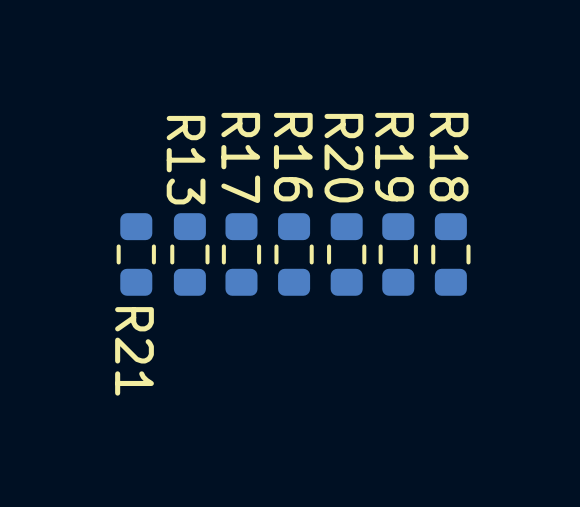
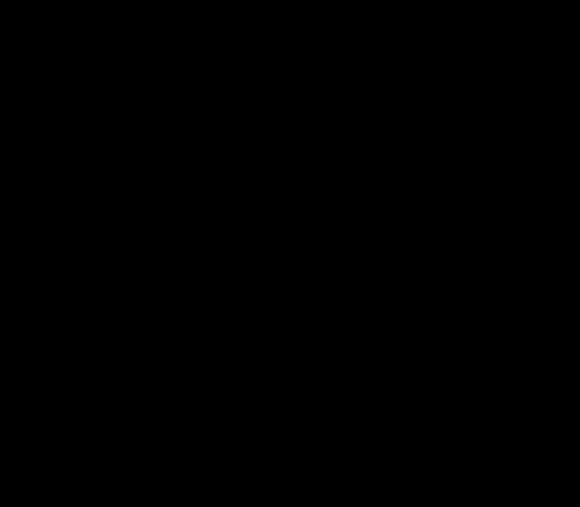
R21: (136, 254) -> none
R13: (189, 254) -> none
R17: (241, 254) -> none
R16: (294, 254) -> none
R20: (346, 254) -> none
R19: (398, 254) -> none
R18: (450, 254) -> none

